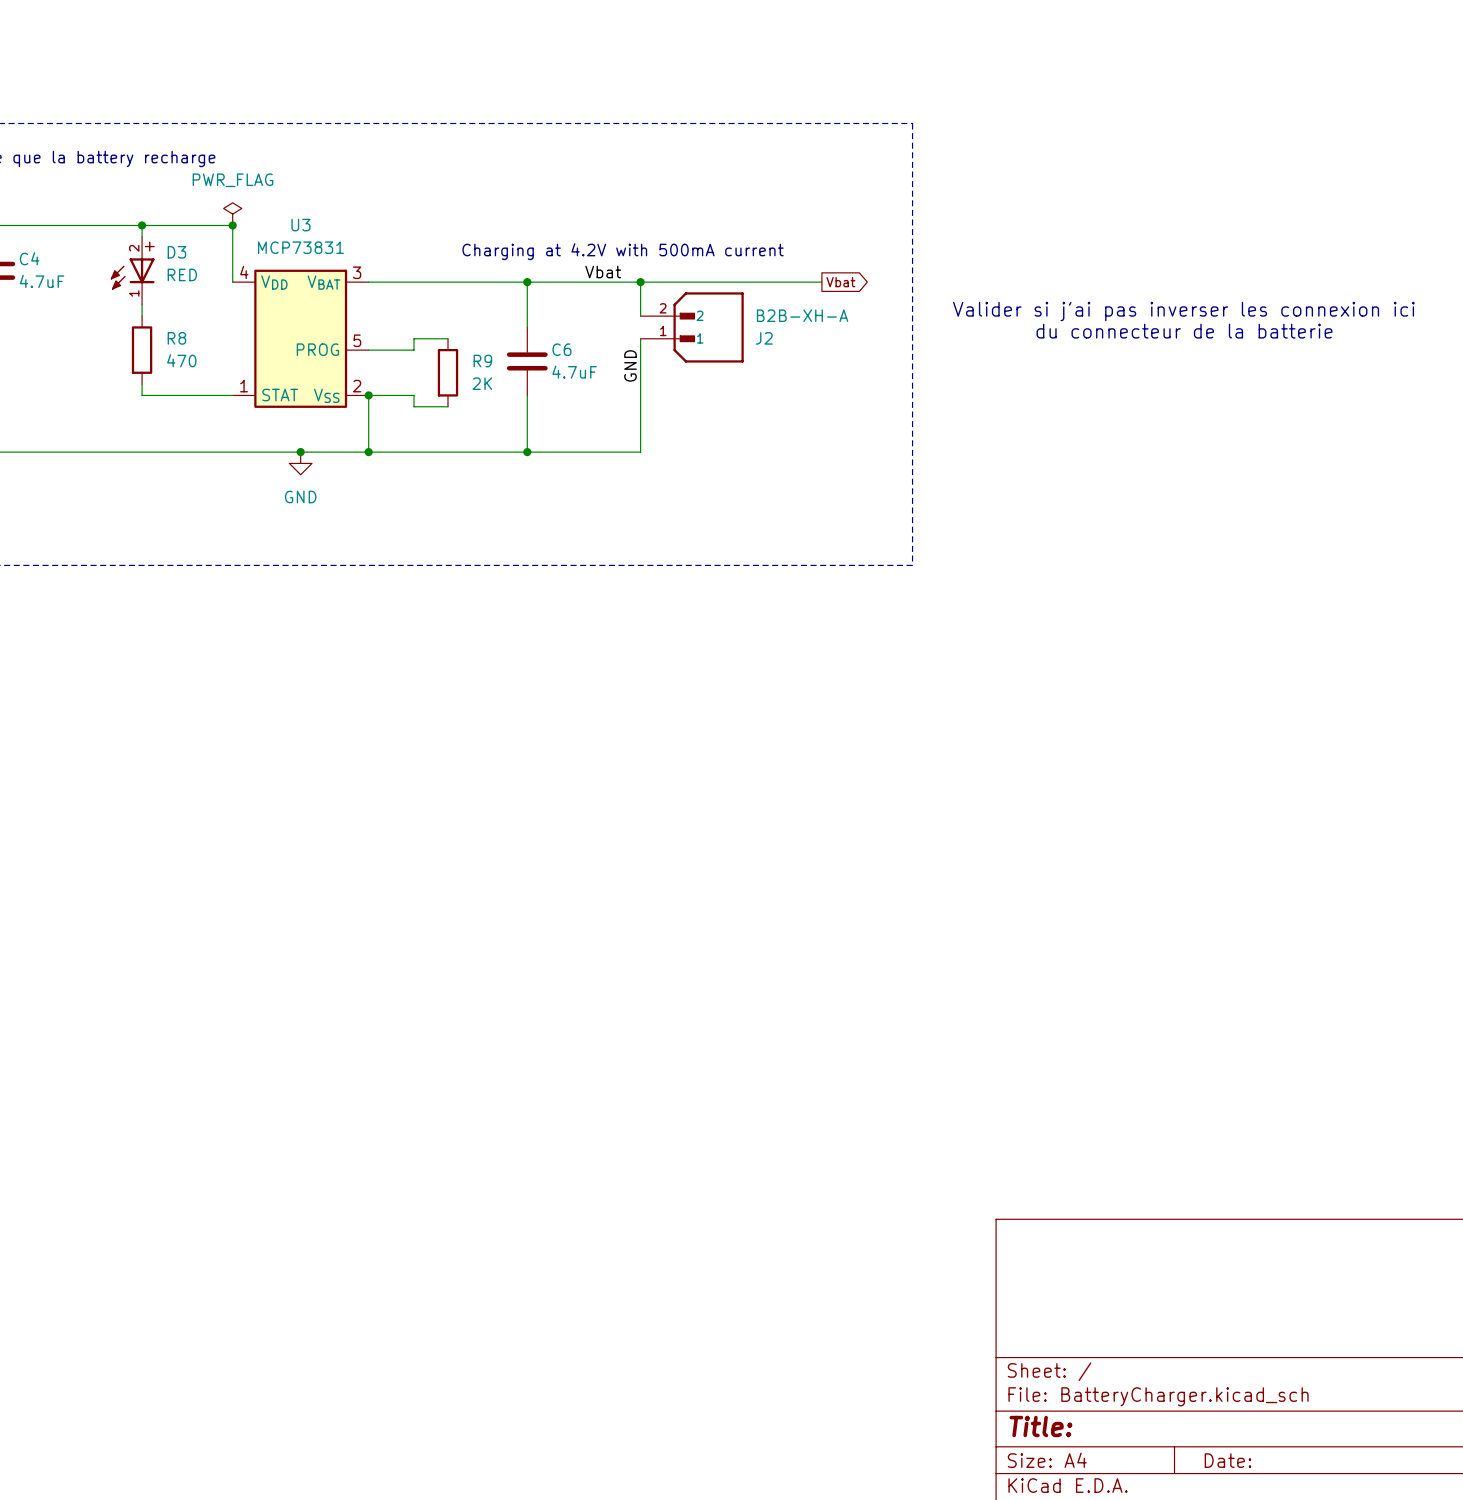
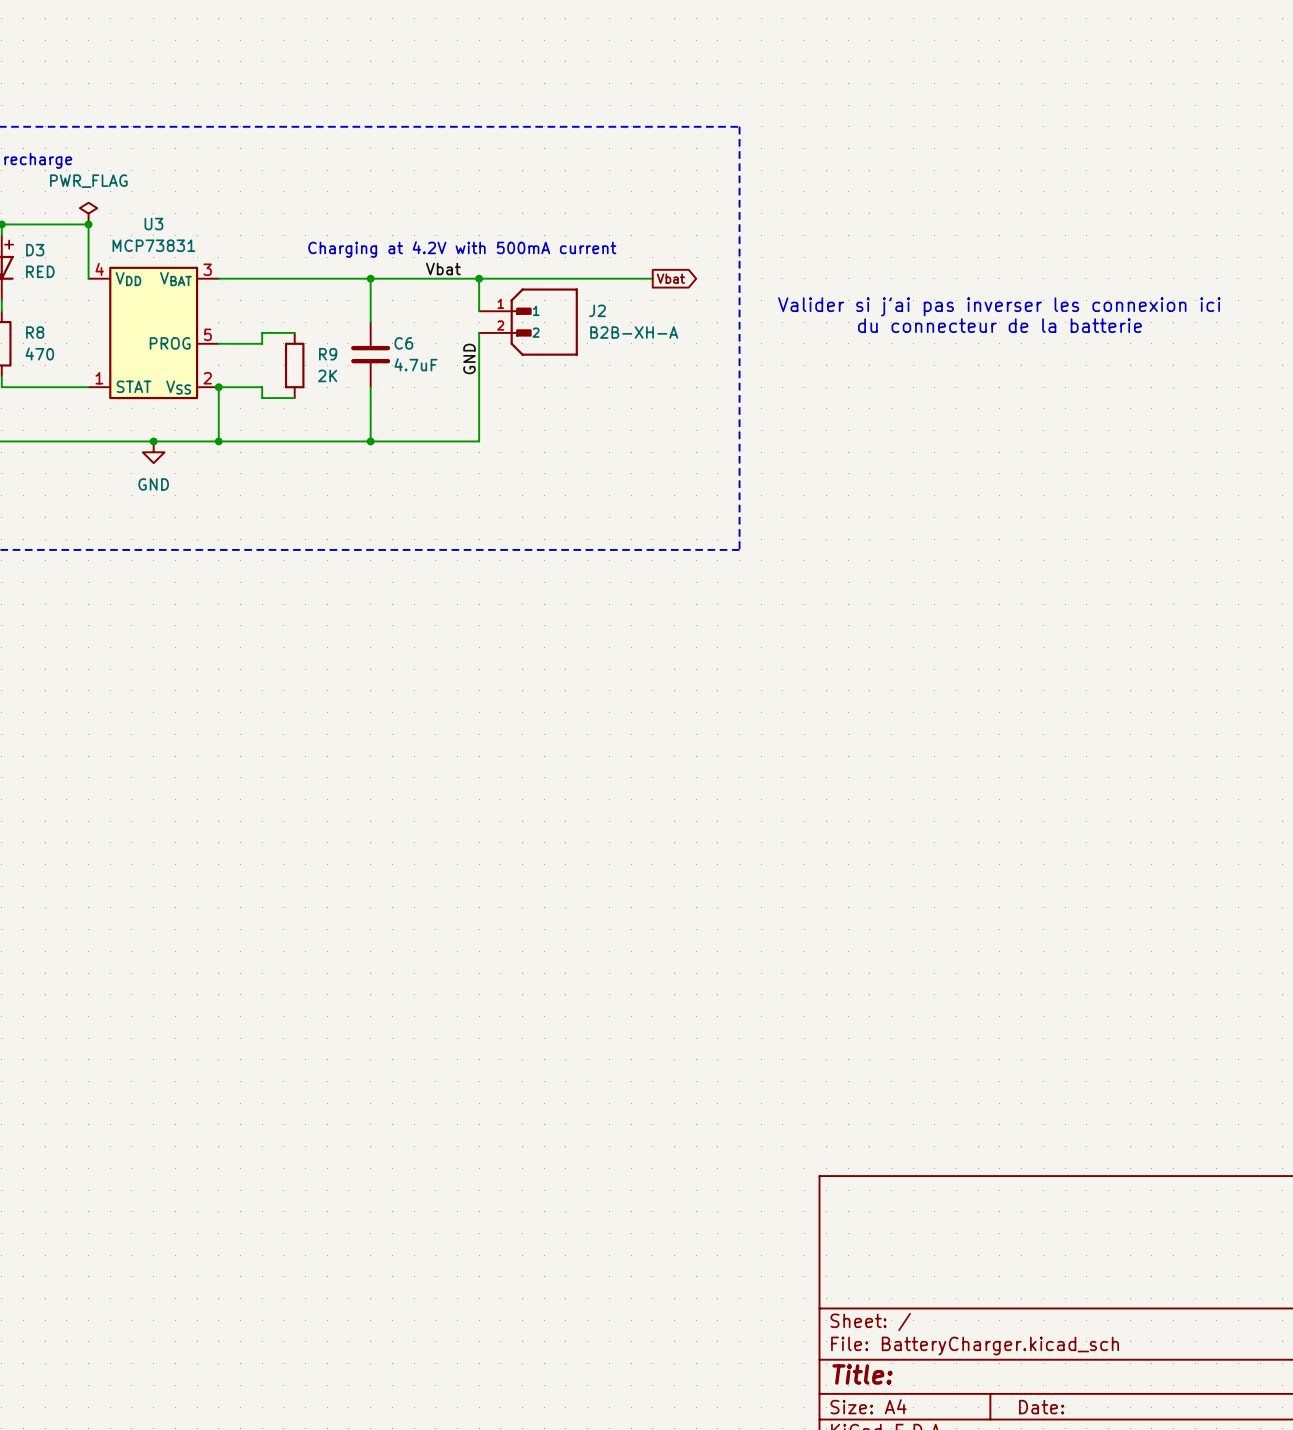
J2 flip: as is (708, 327) -> up-down (544, 322)

